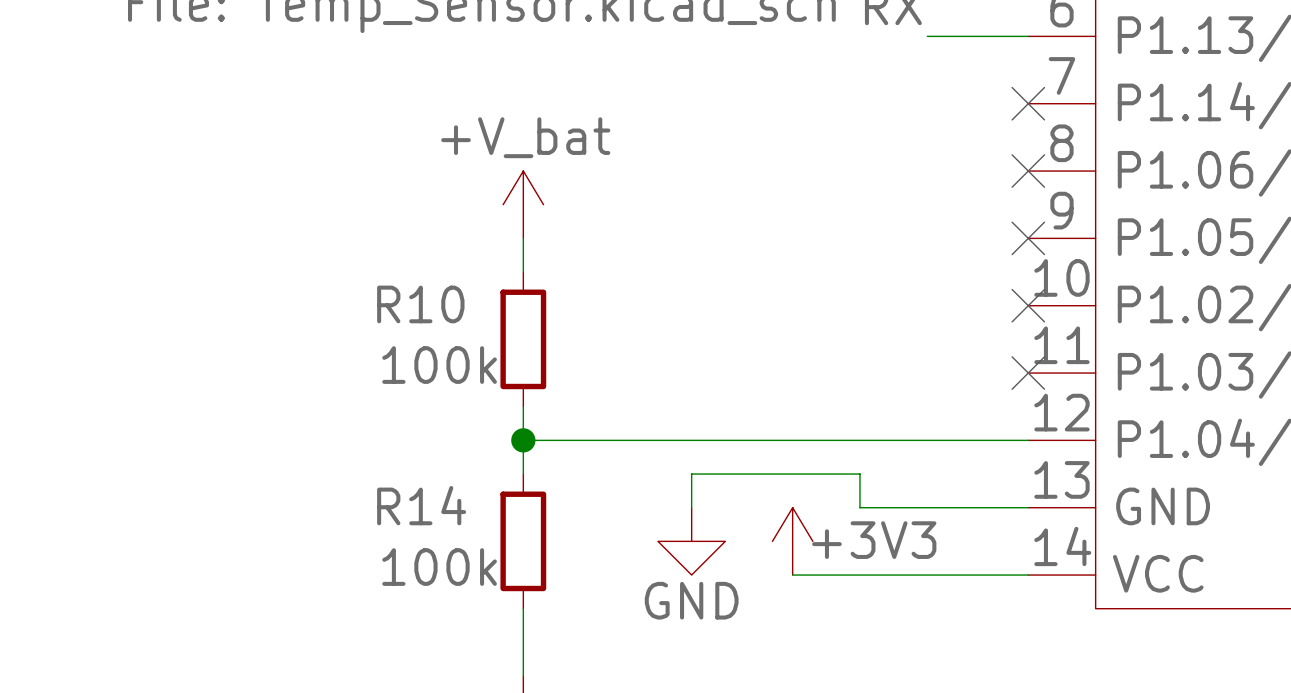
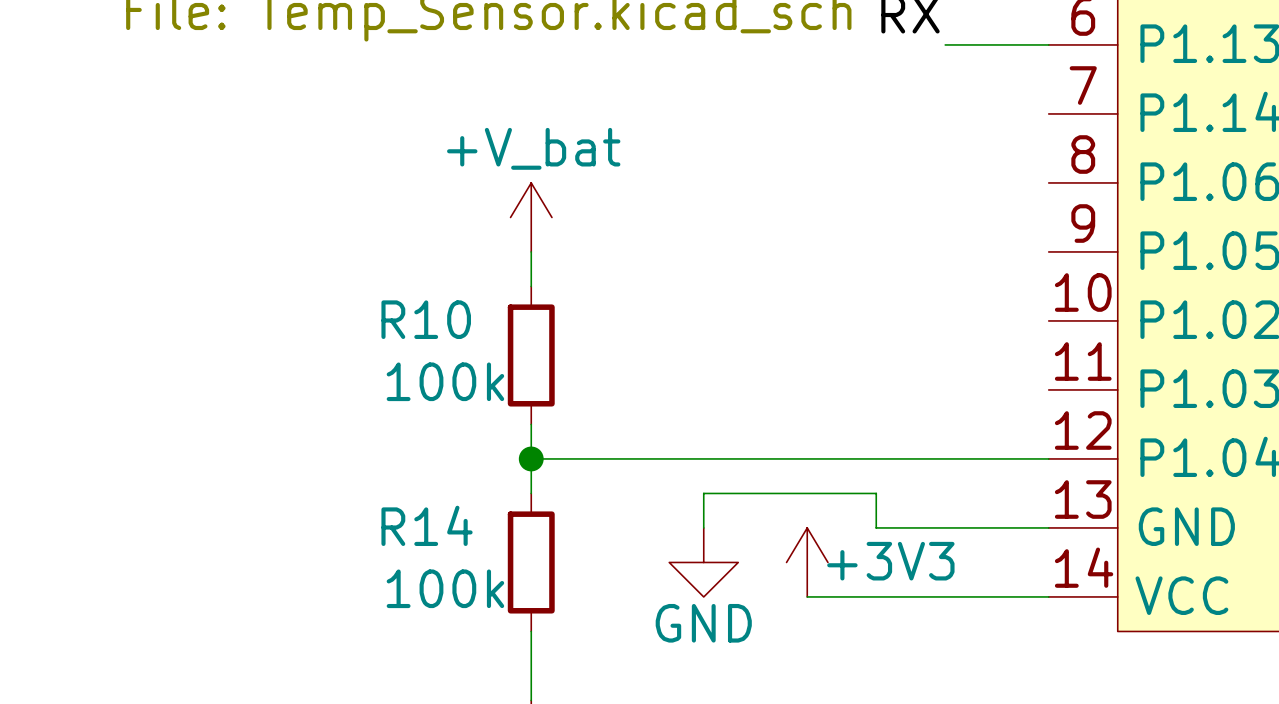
no-connect mark: (1028, 103) -> none
no-connect mark: (1028, 171) -> none
no-connect mark: (1028, 238) -> none
no-connect mark: (1028, 305) -> none
no-connect mark: (1028, 373) -> none

